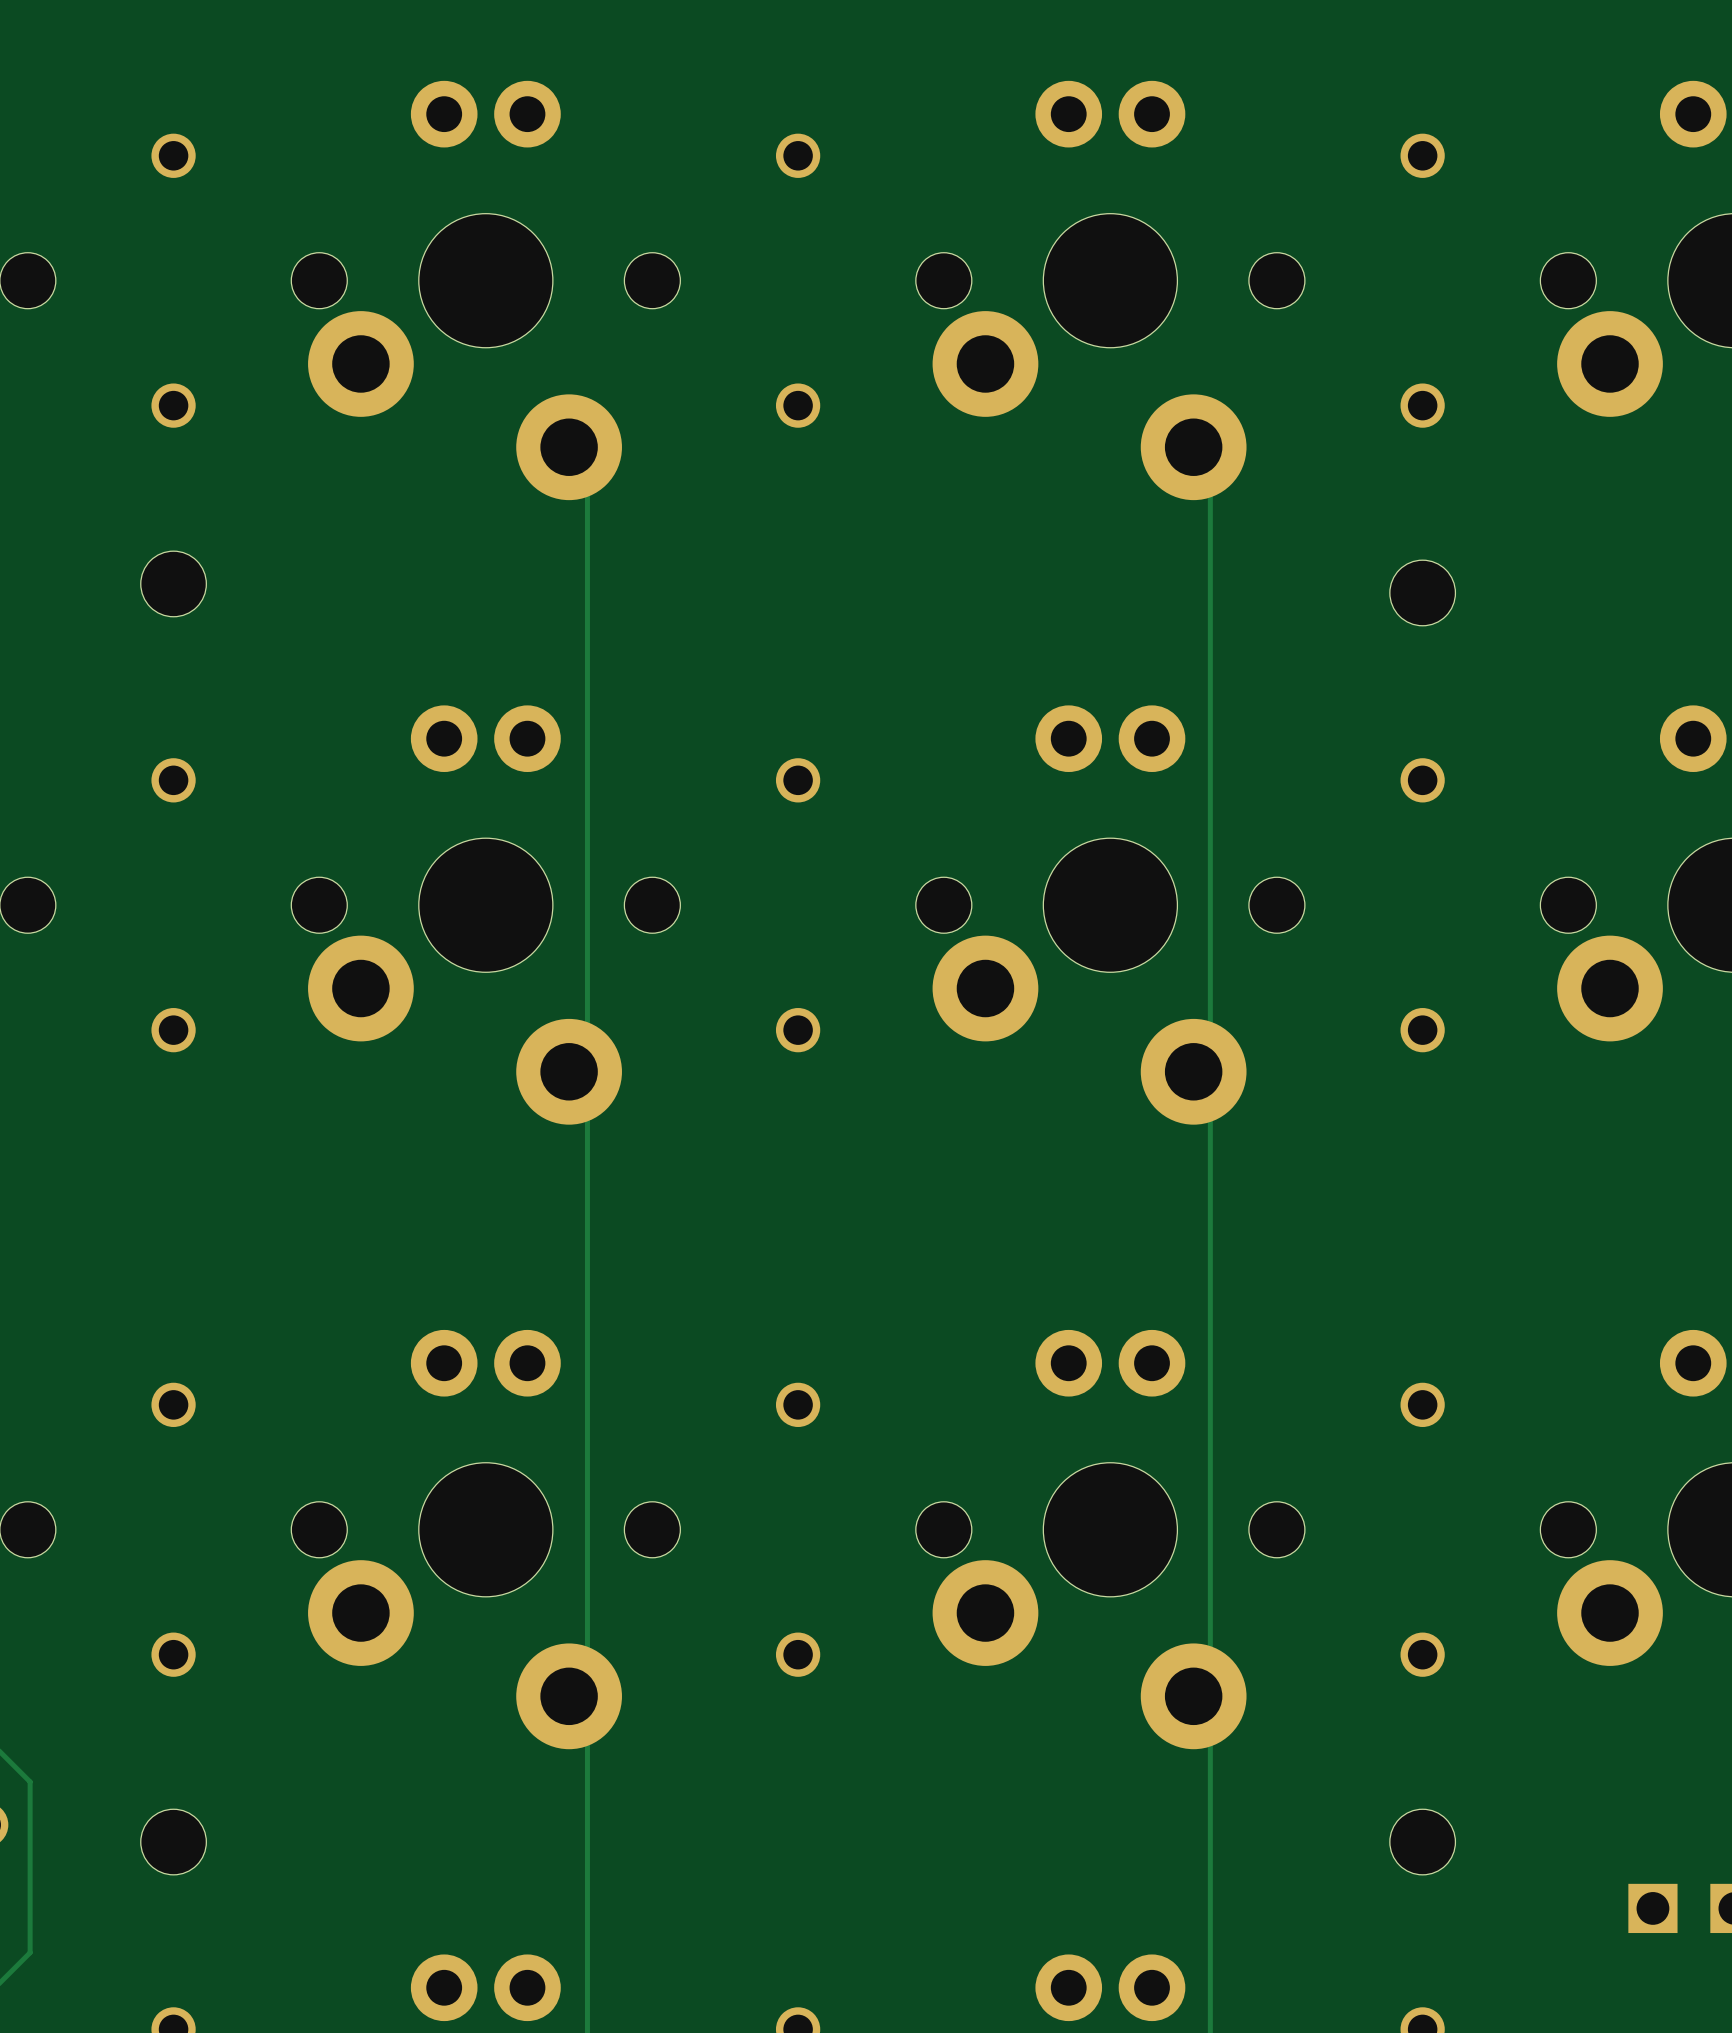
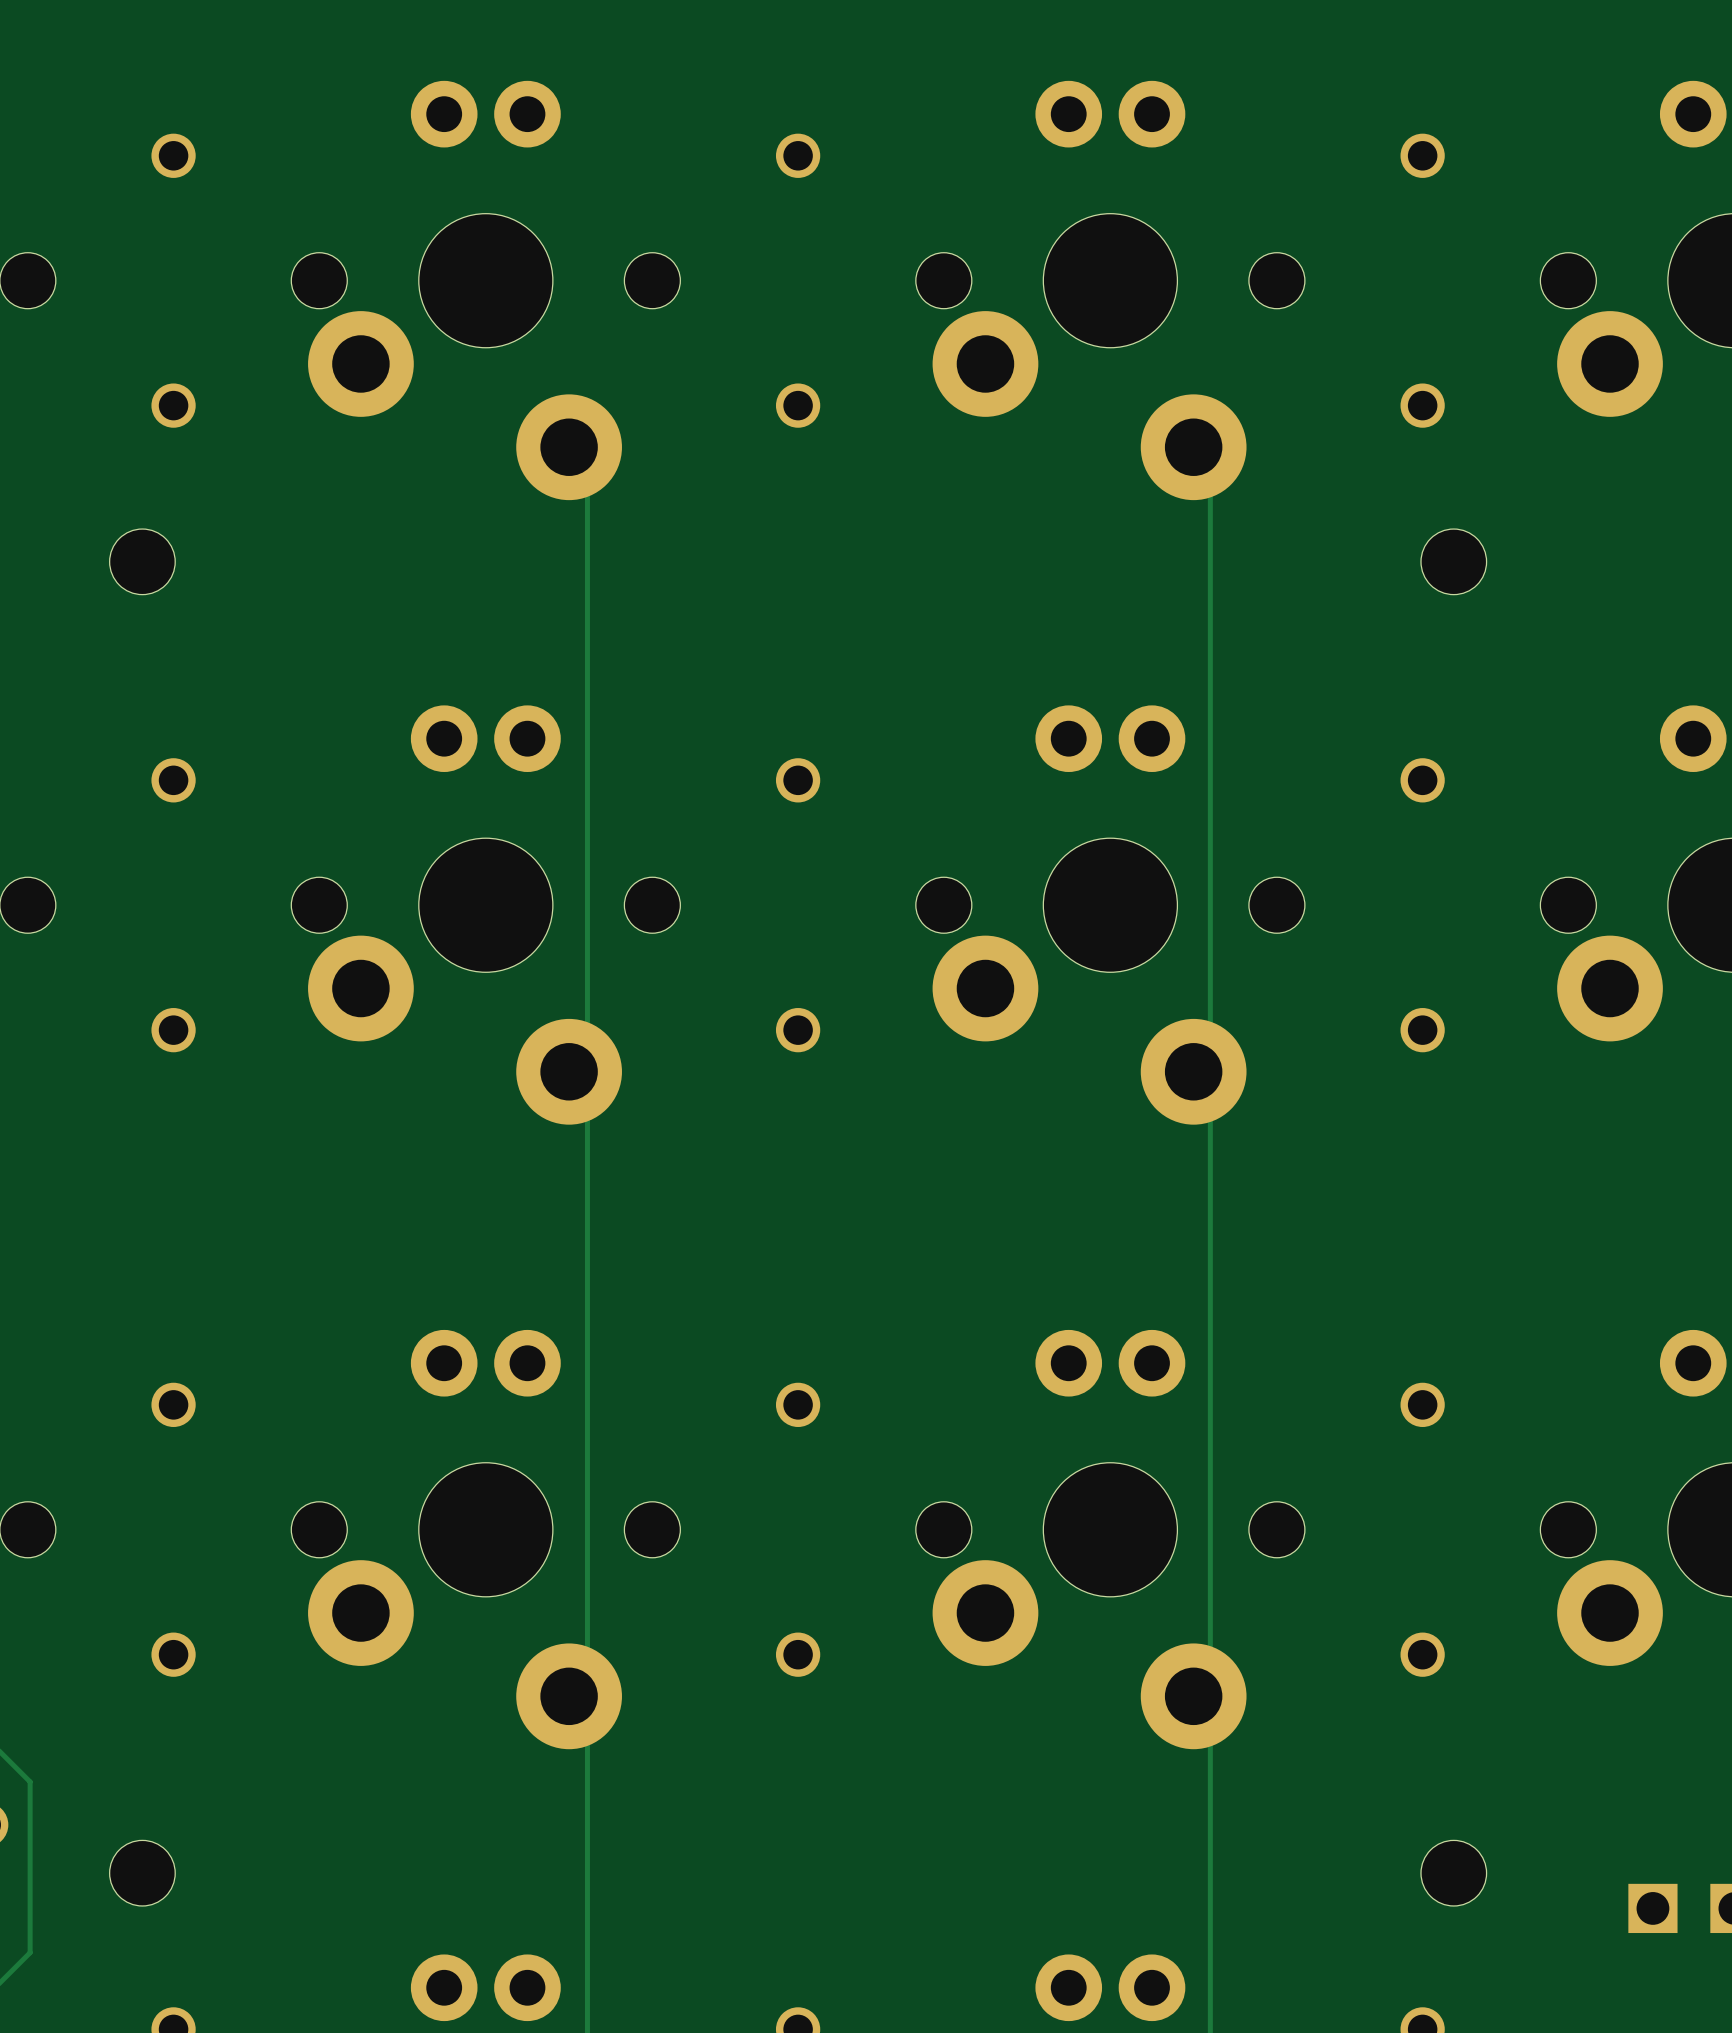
hole position: (173, 583) -> (142, 561)
hole position: (1422, 592) -> (1453, 561)
hole position: (173, 1842) -> (142, 1873)
hole position: (1422, 1842) -> (1453, 1873)

